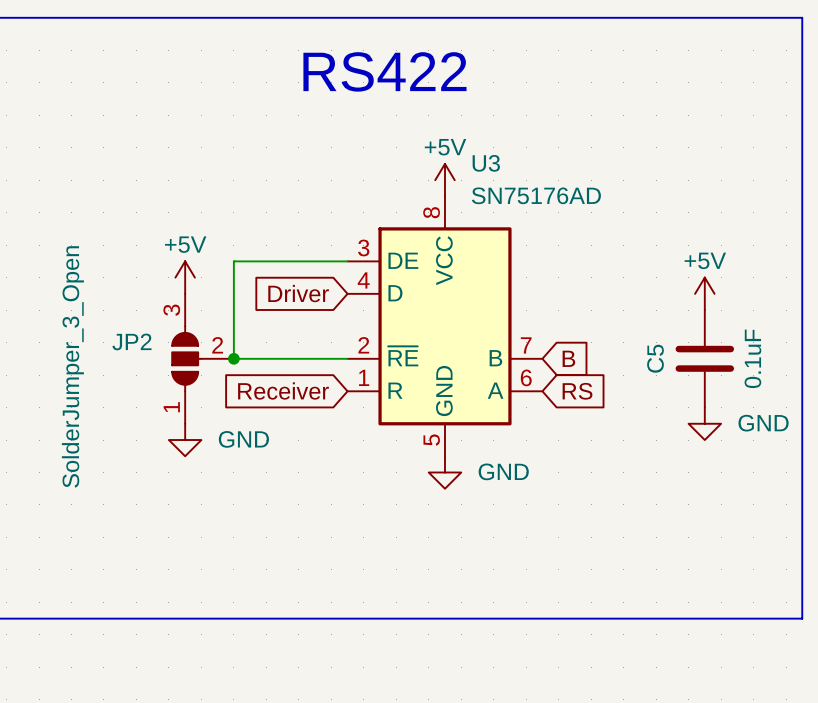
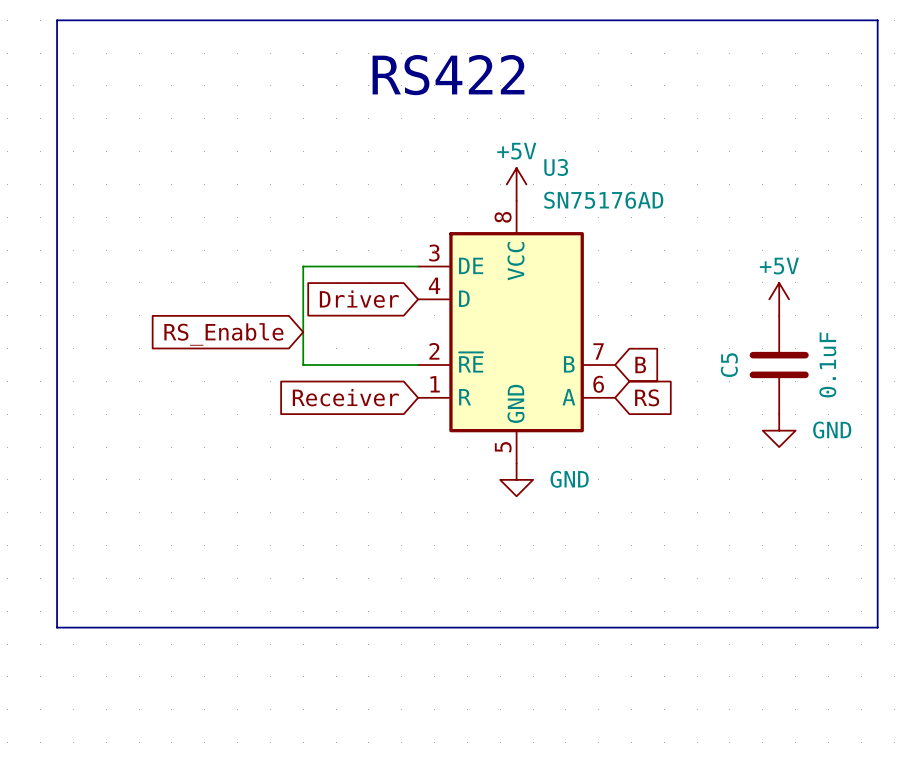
power symbol: +5V (185, 277) -> none
global label: none -> RS_Enable (223, 334)
JP2: SolderJumper_3_Open (203, 358) -> none
junction: (233, 358) -> none
power symbol: GND (185, 440) -> none

